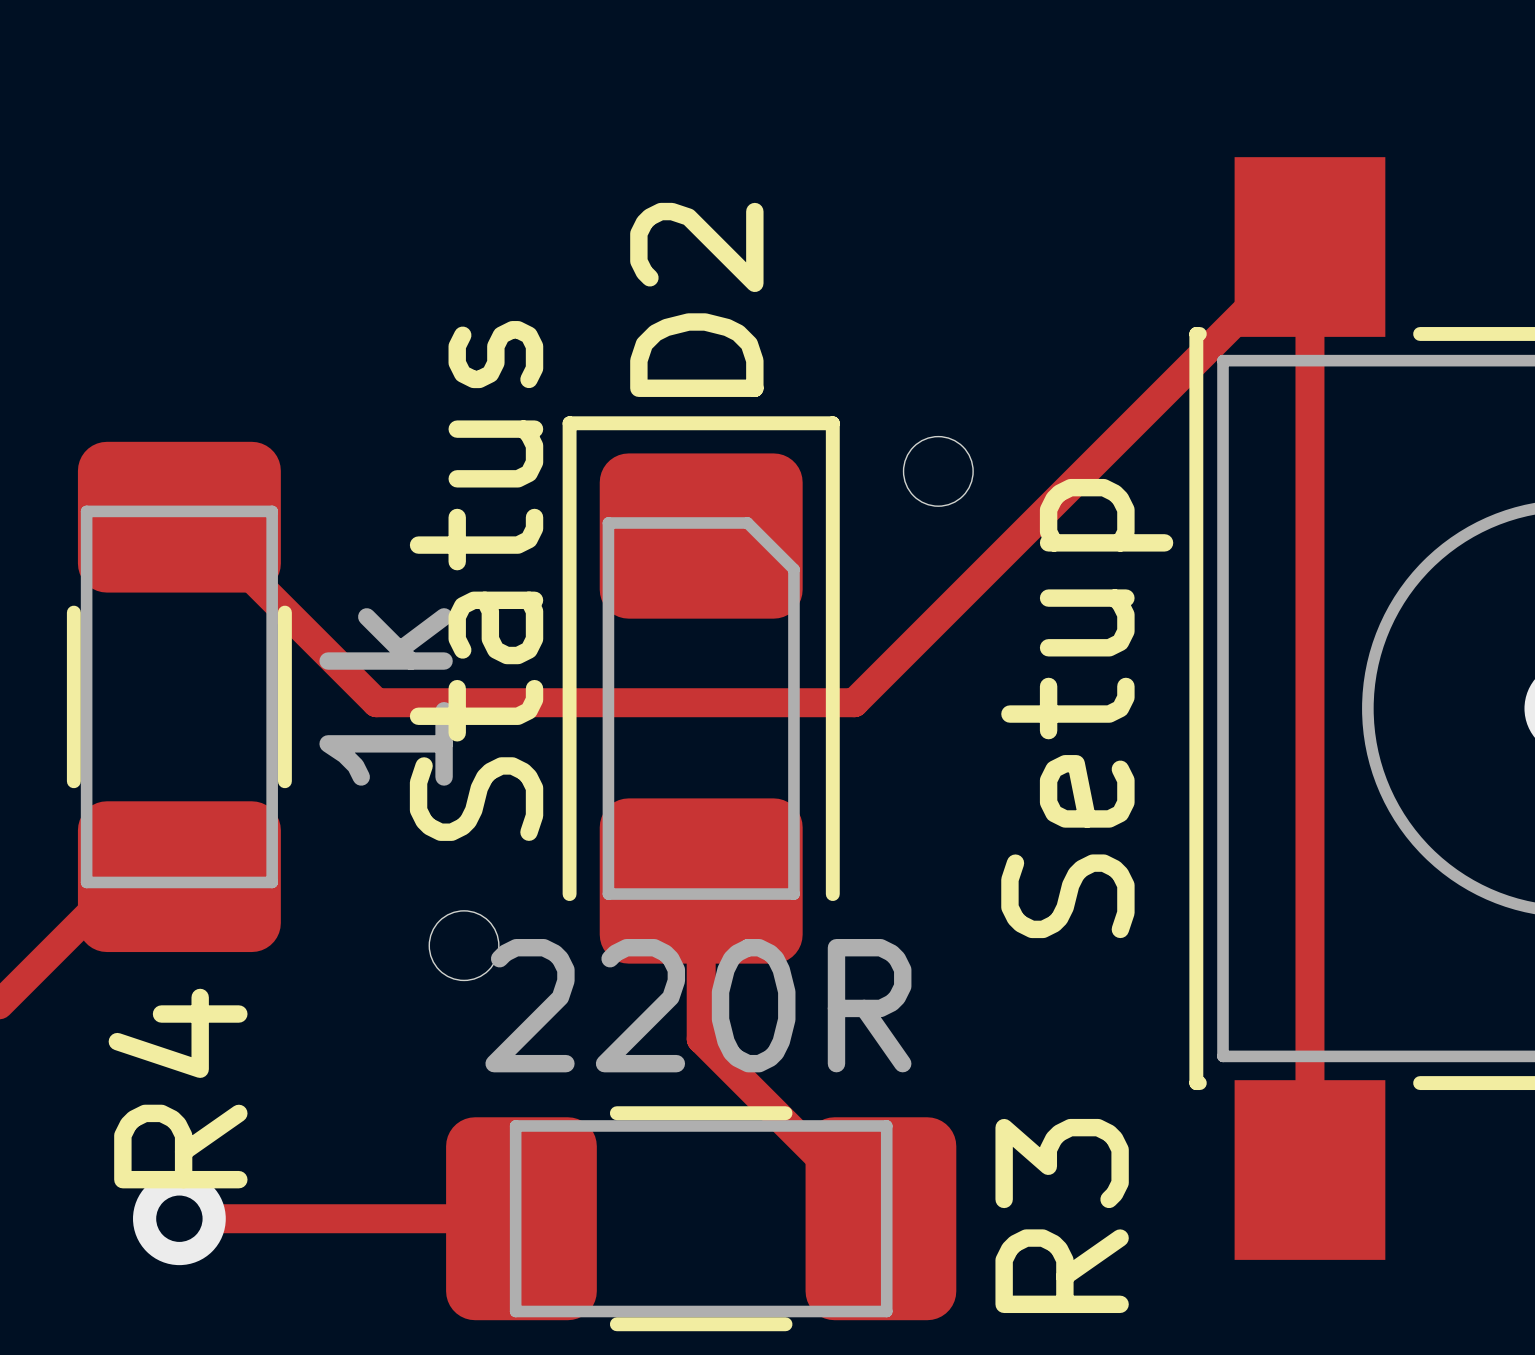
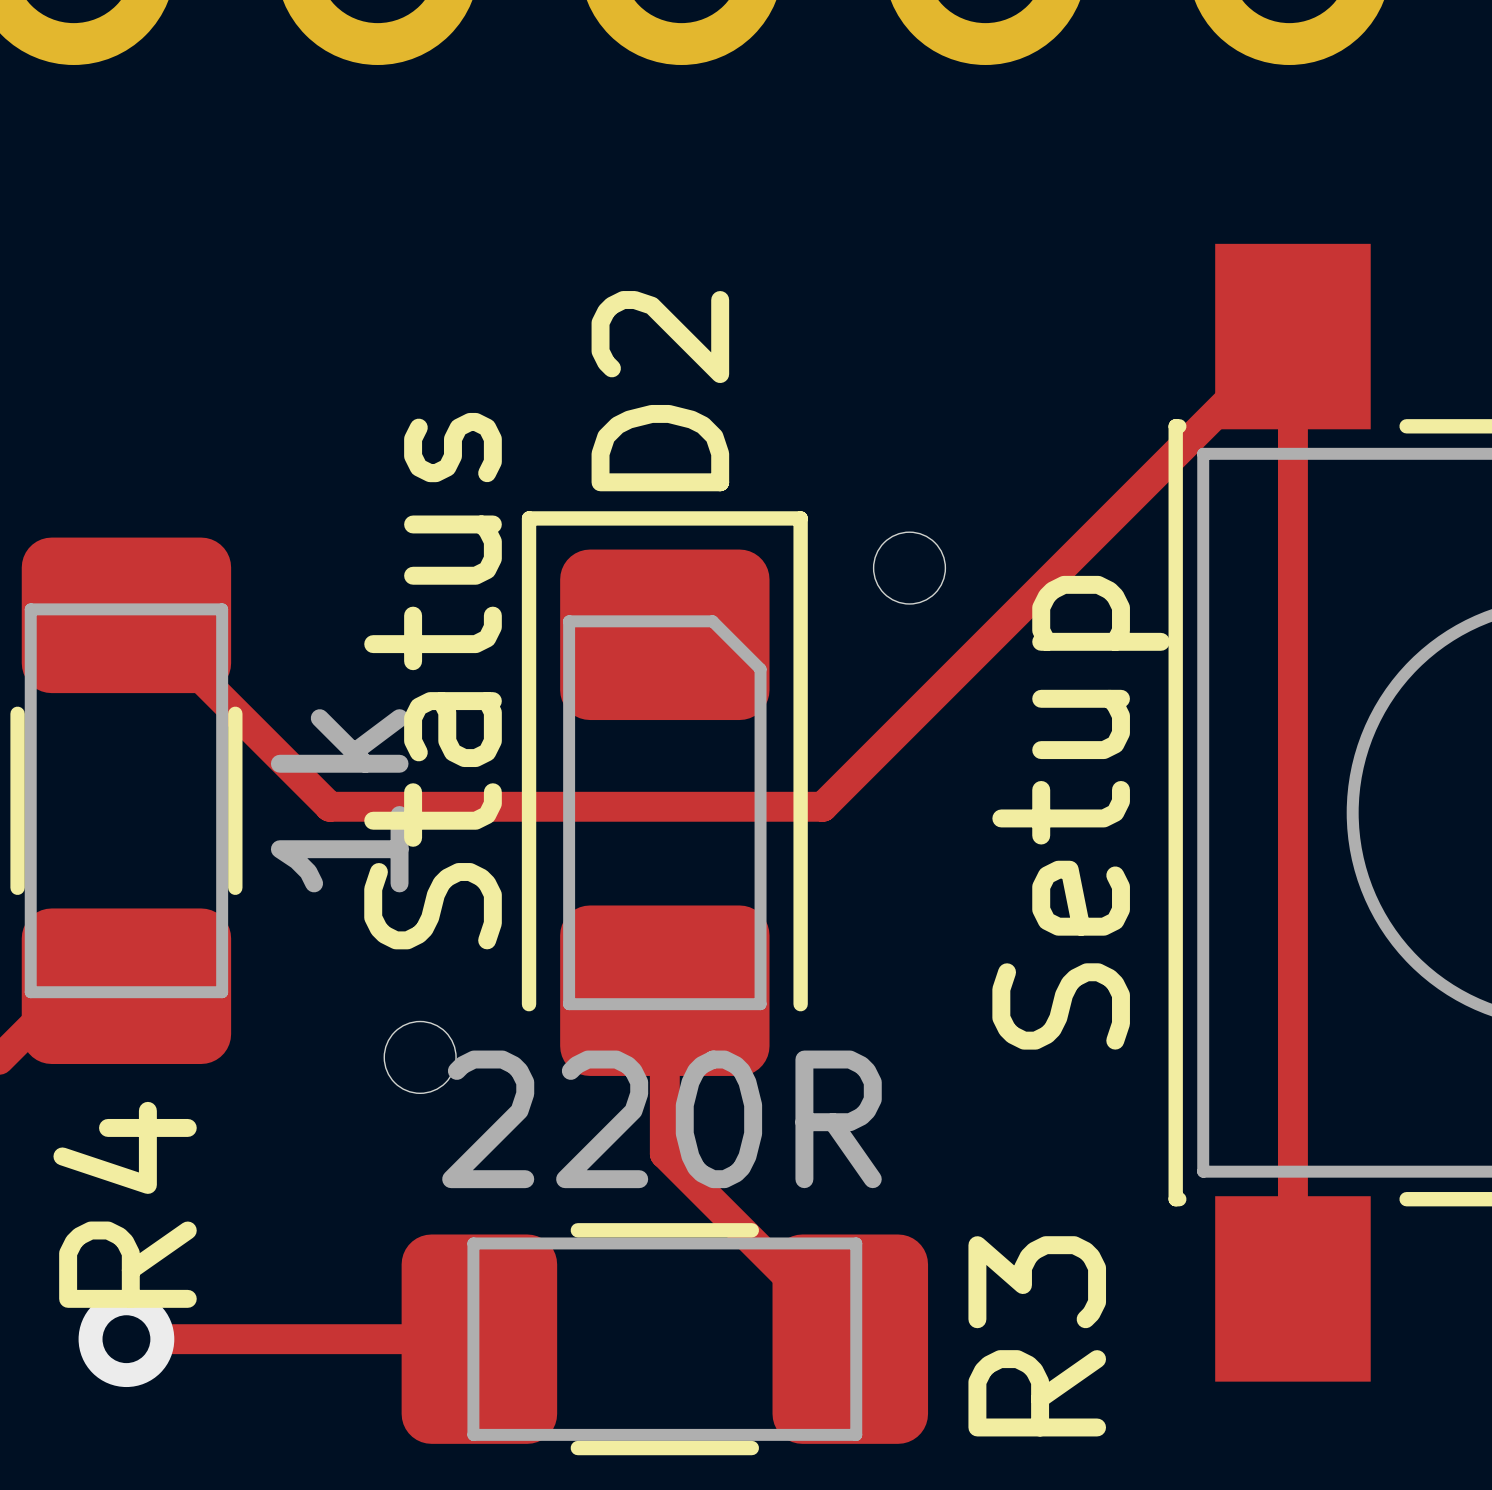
part value position: Setup (1087, 708) -> Setup (1081, 812)

